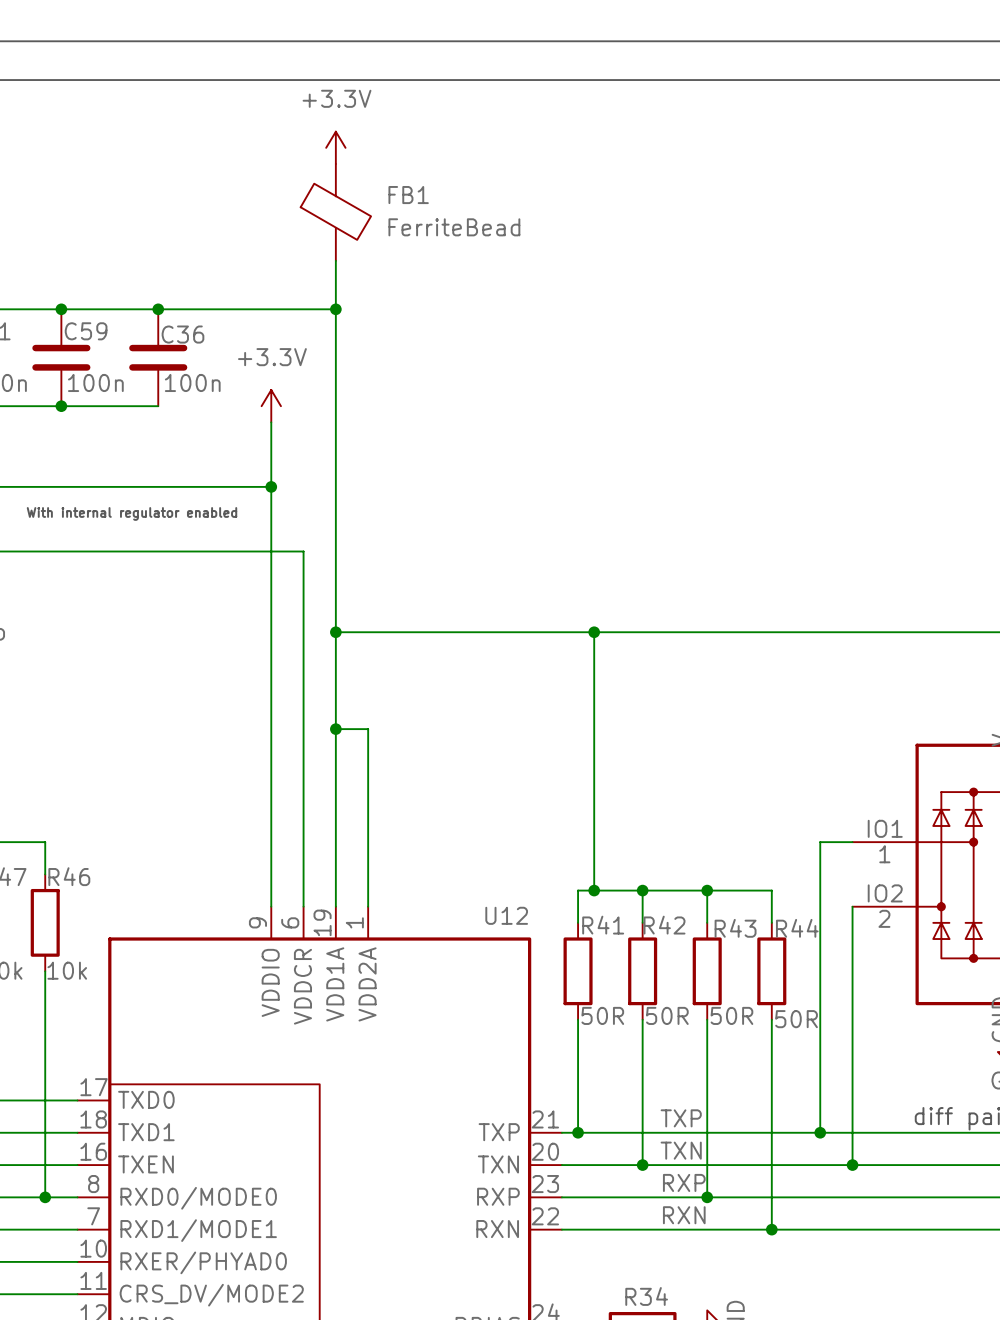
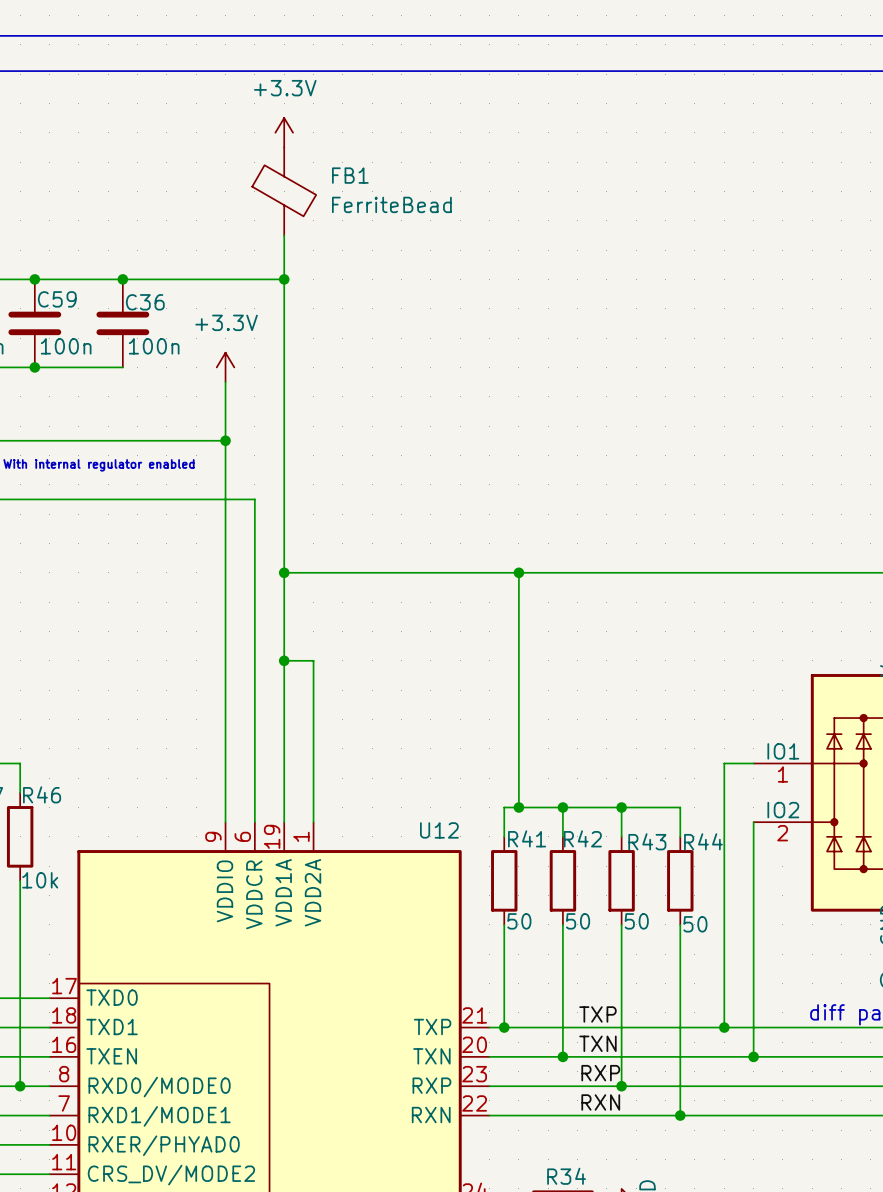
R41 value: 50R (602, 1015) -> 50 (519, 921)
R42 value: 50R (667, 1015) -> 50 (578, 921)
R43 value: 50R (731, 1015) -> 50 (636, 921)
R44 value: 50R (796, 1019) -> 50 (695, 924)

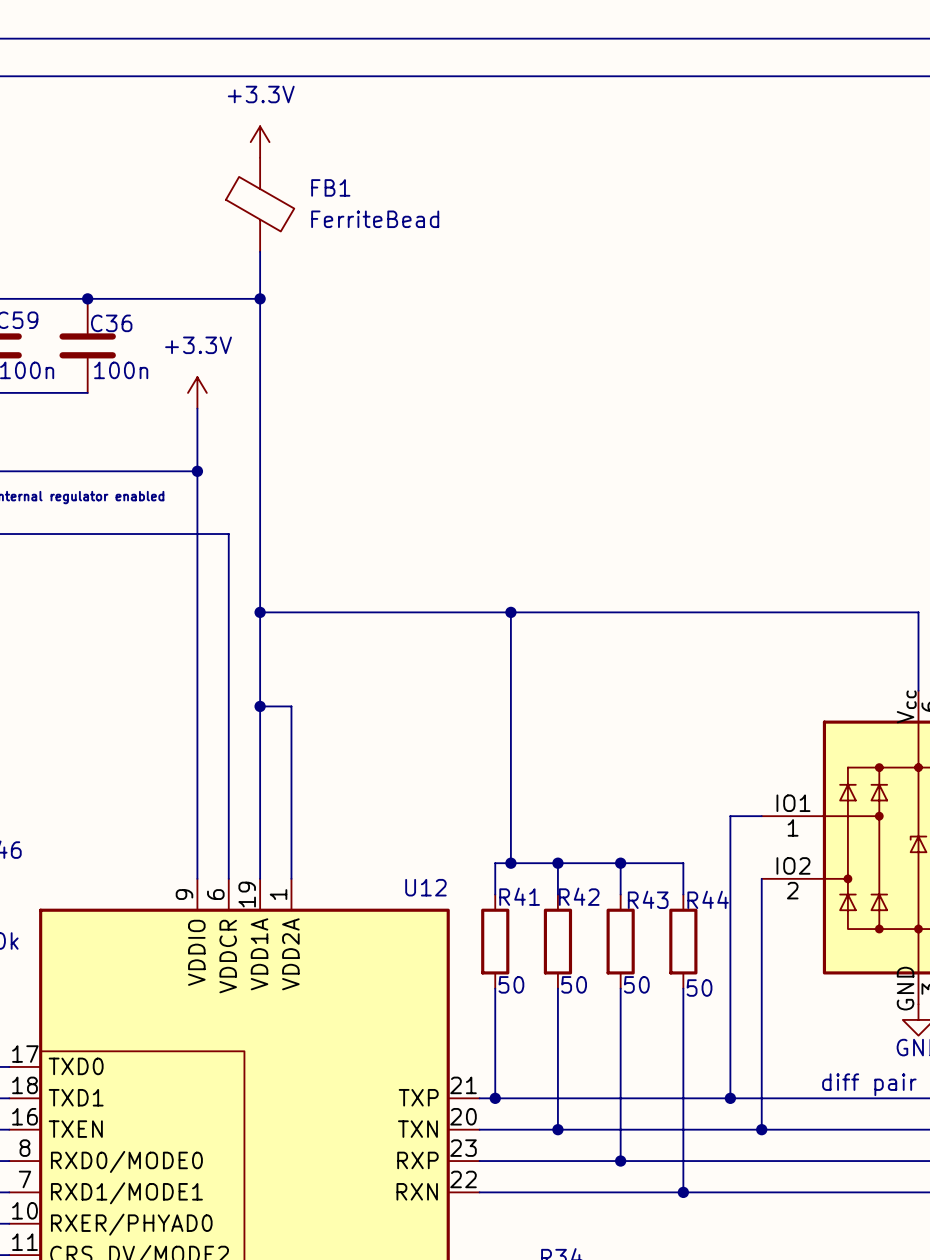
label: TXP (597, 1014) -> none
label: TXN (597, 1043) -> none
label: RXP (600, 1073) -> none
label: RXN (600, 1102) -> none

